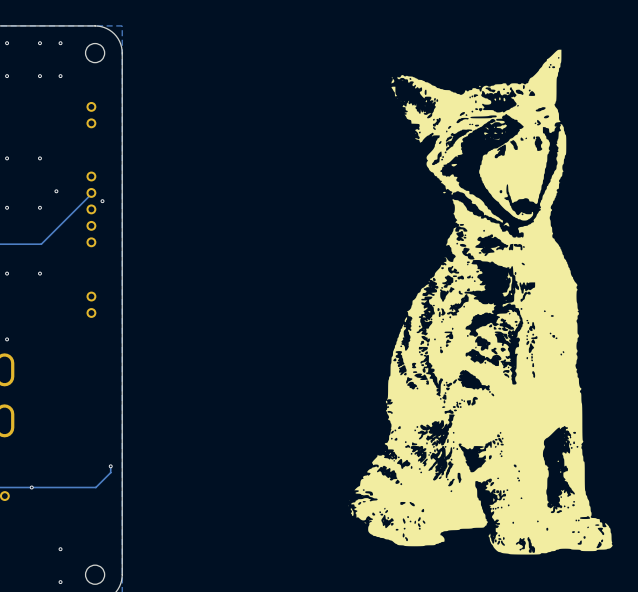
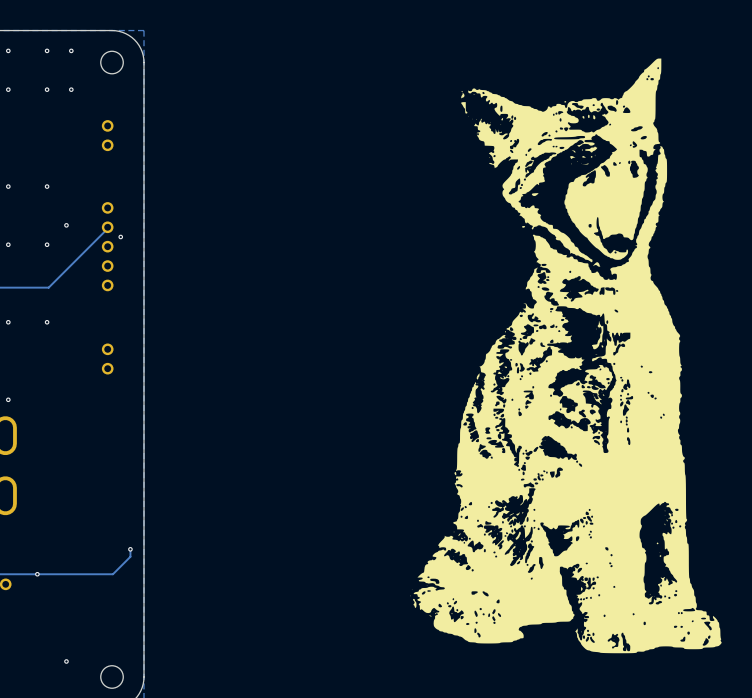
via: (60, 549) -> none
via: none -> (66, 661)
via: (60, 582) -> none

